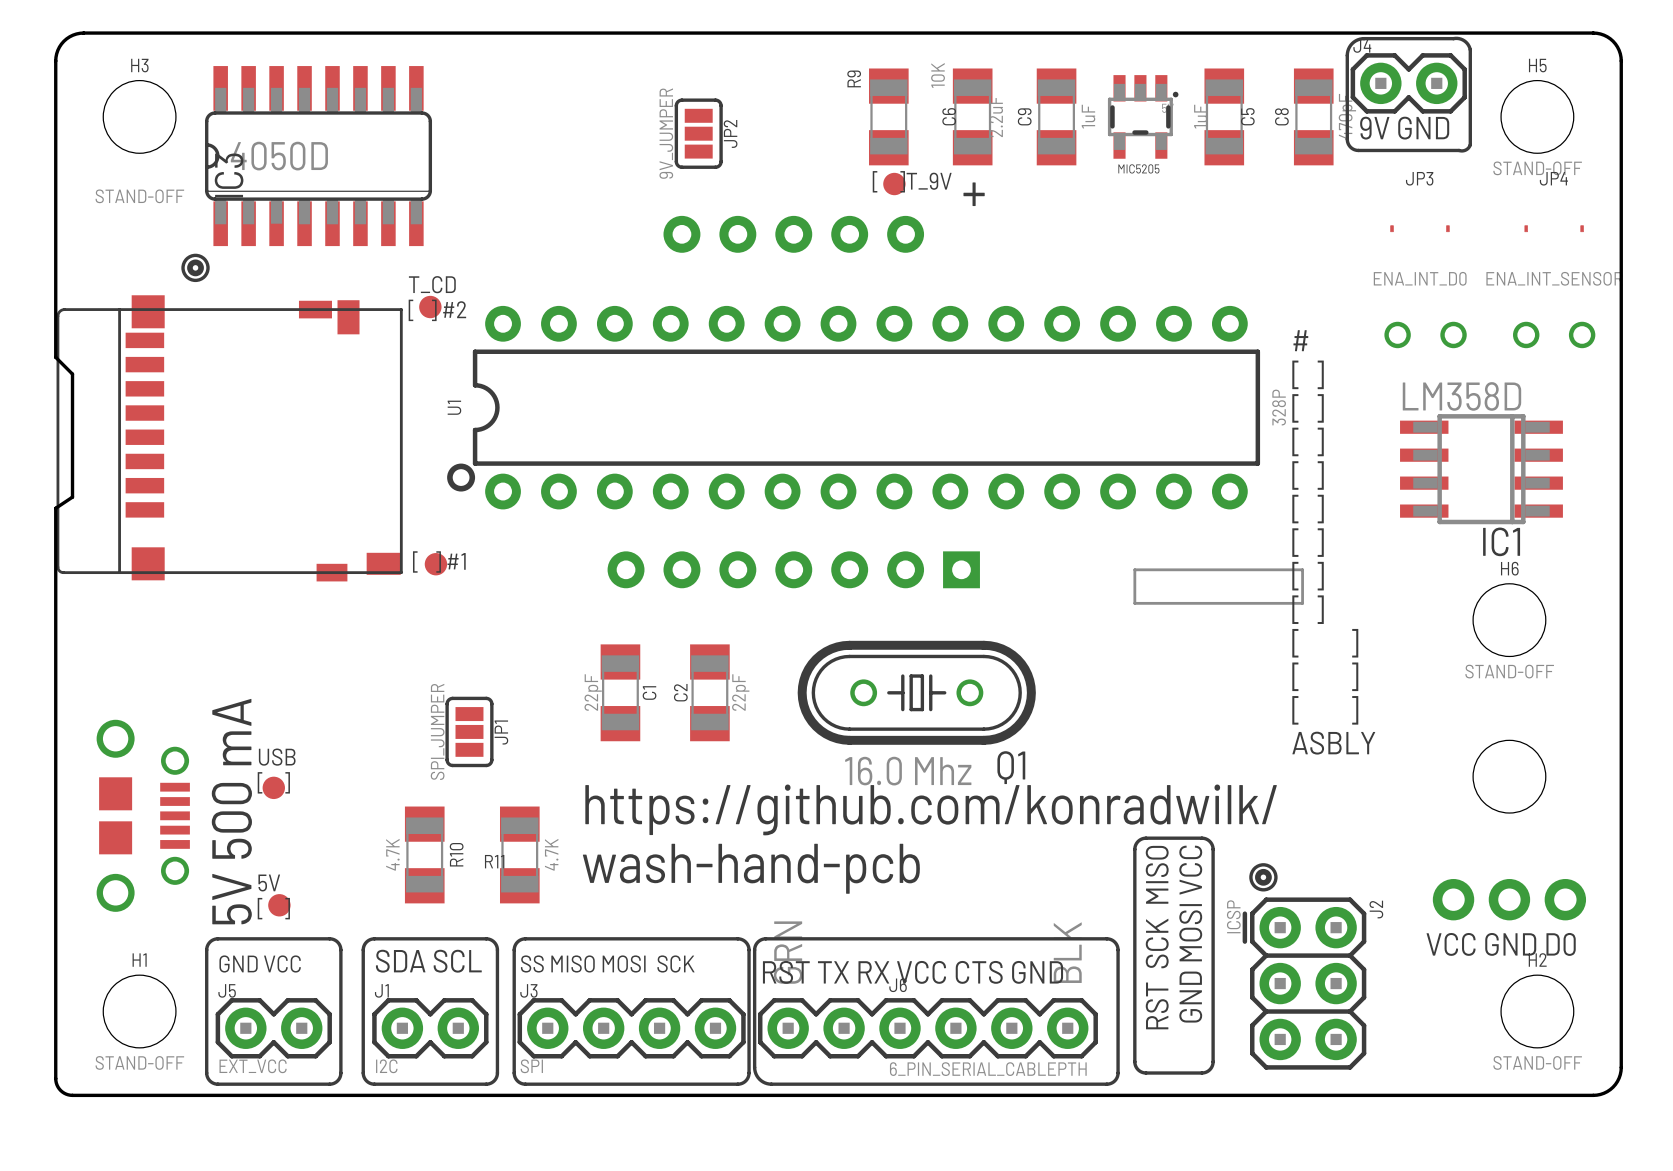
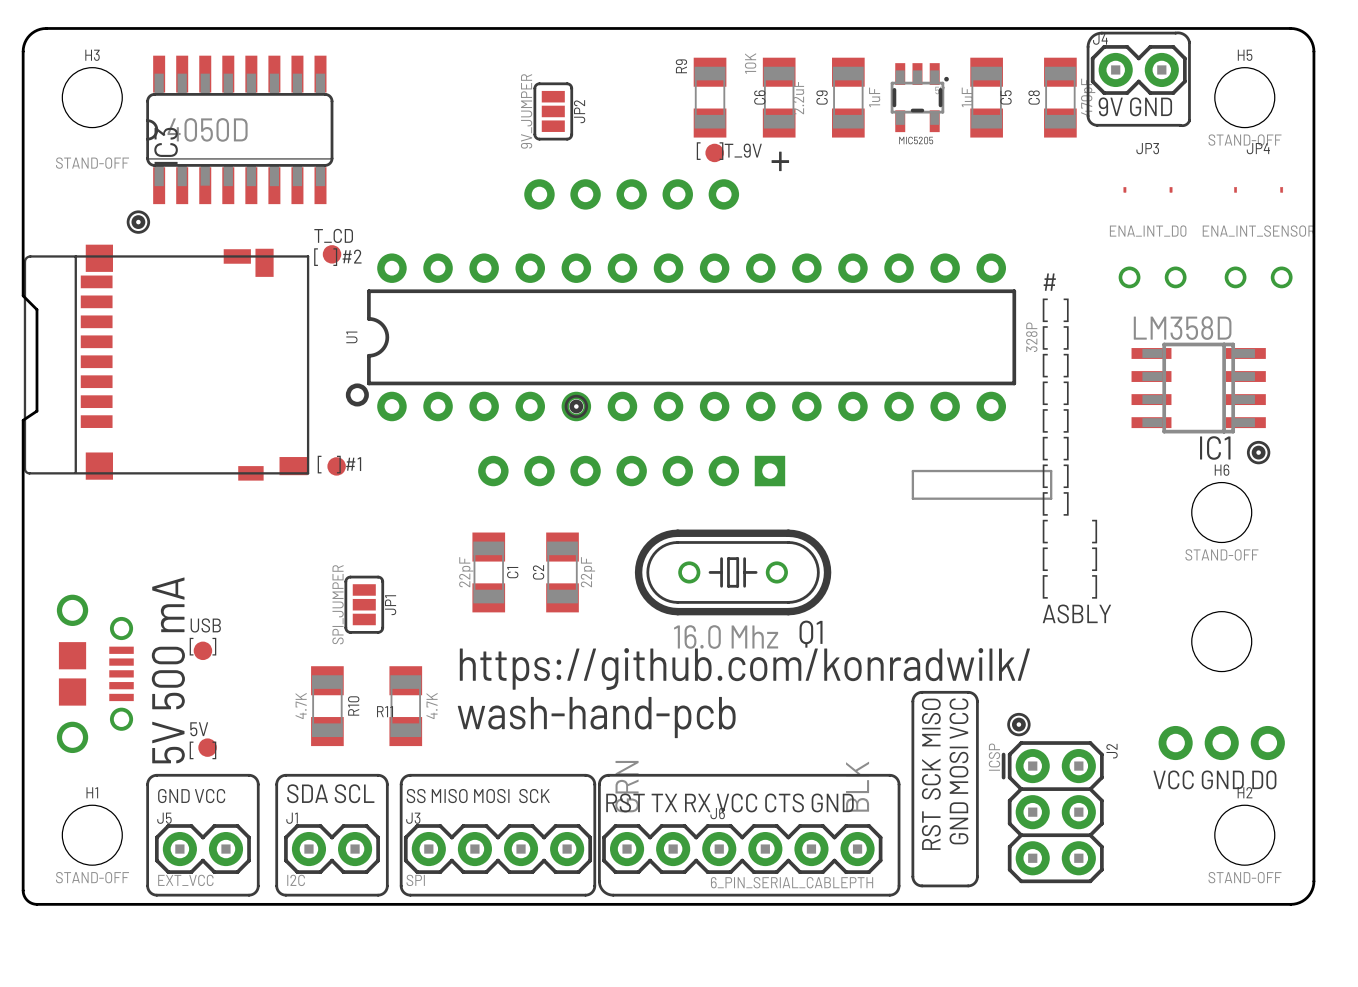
drawing: none -> [564, 394, 589, 419]
drawing: none -> [1246, 440, 1271, 465]

